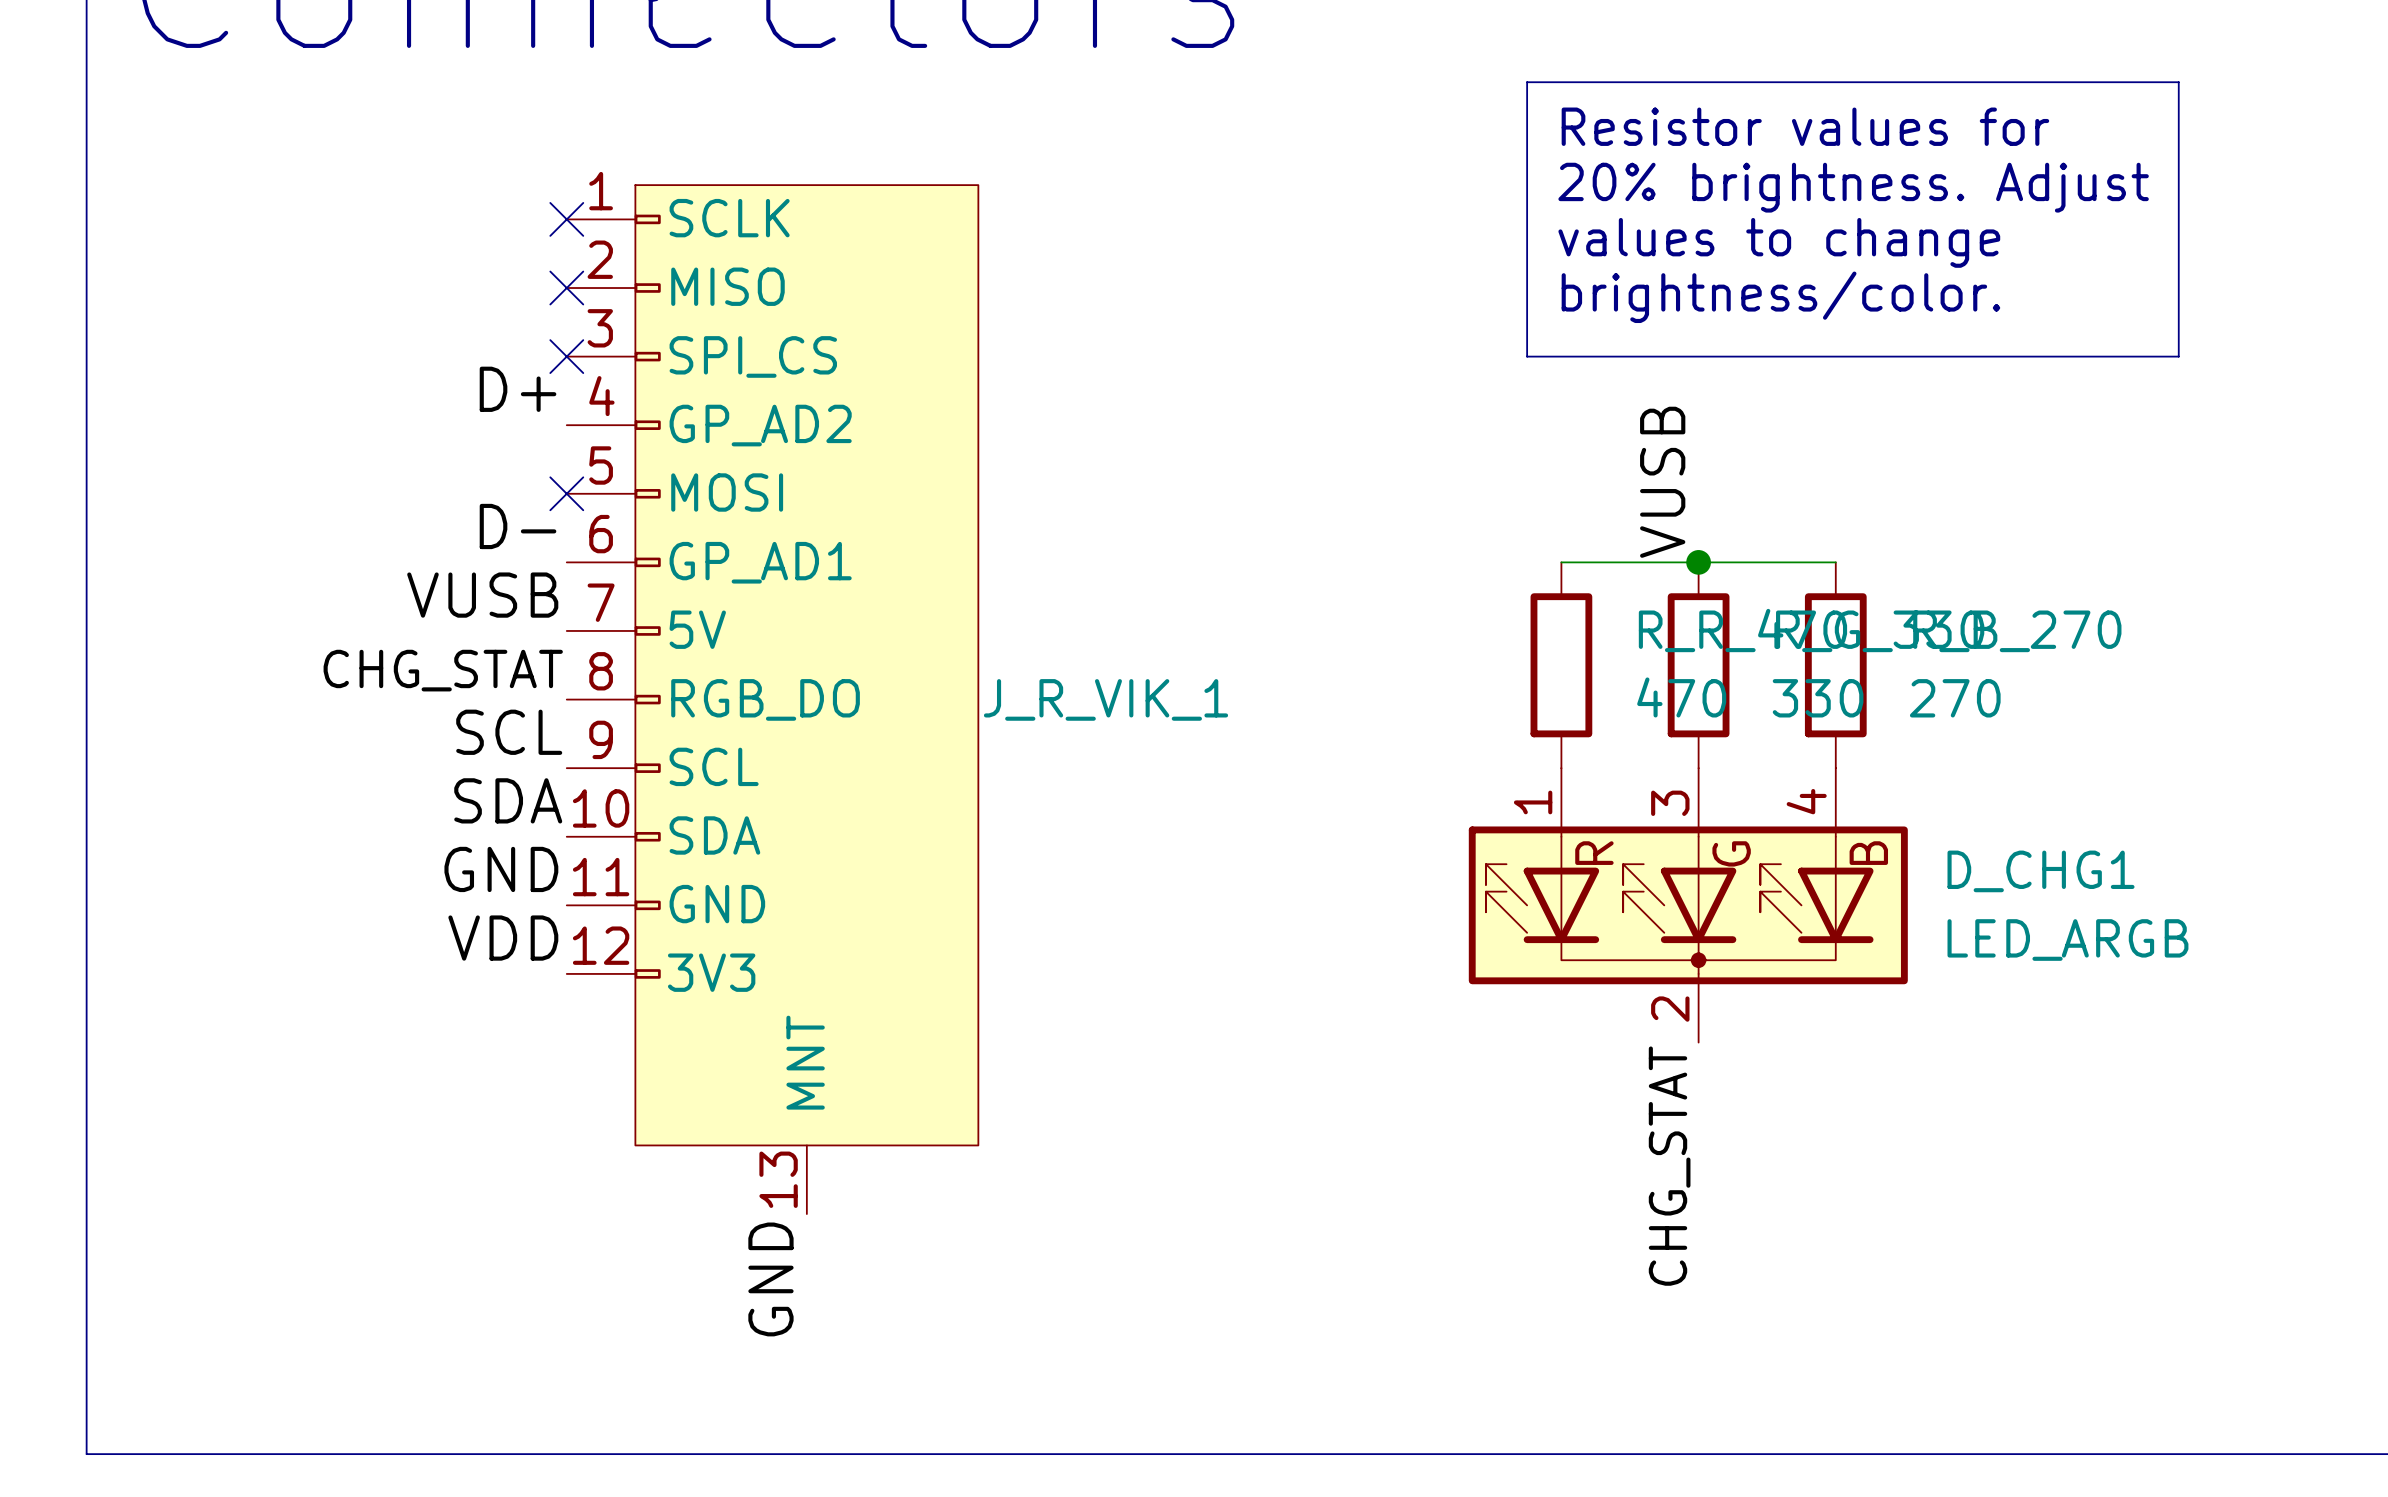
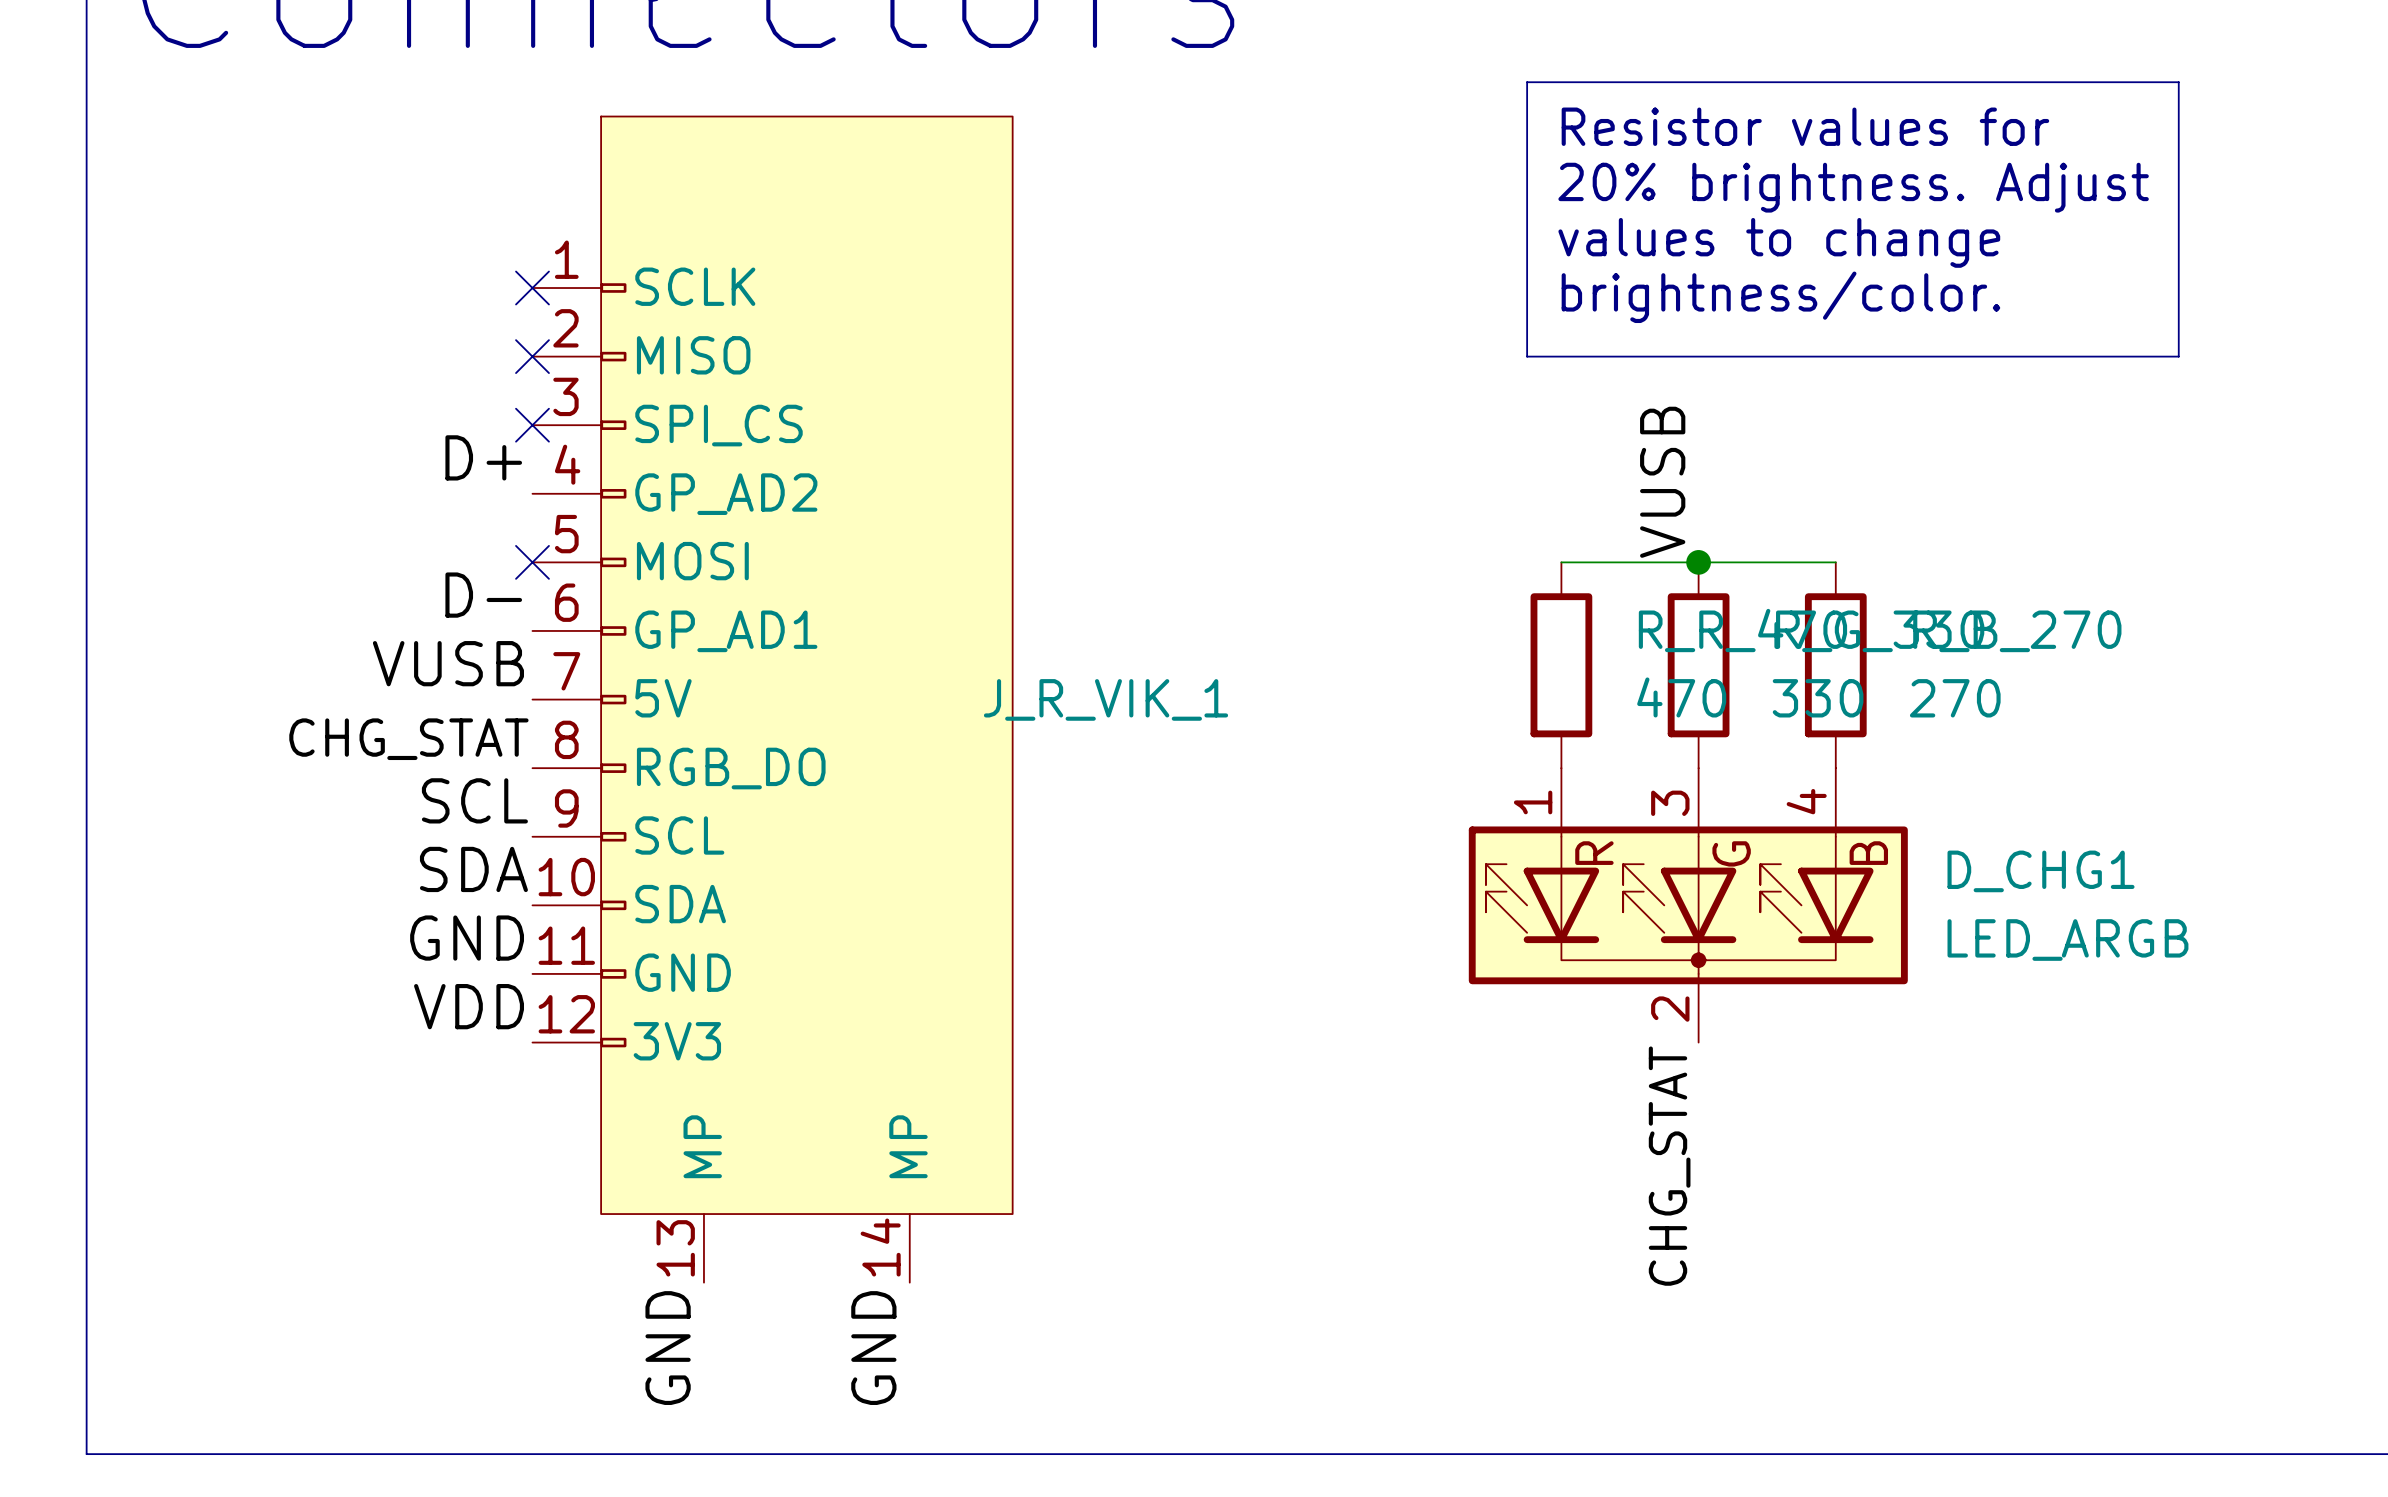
J_R_VIK_1 symbol: [566, 185, 979, 1215] -> [532, 116, 1013, 1283]
no-connect mark: (566, 219) -> none
no-connect mark position: (566, 288) -> (532, 288)
no-connect mark position: (566, 356) -> (532, 356)
label position: D+ (518, 389) -> D+ (483, 457)
no-connect mark: none -> (532, 425)
no-connect mark: (566, 493) -> none
label position: D- (518, 526) -> D- (483, 595)
no-connect mark: none -> (532, 562)
label position: VUSB (482, 595) -> VUSB (448, 663)
label position: CHG_STAT (443, 670) -> CHG_STAT (408, 739)
label position: SCL (509, 732) -> SCL (474, 800)
label position: SDA (508, 800) -> SDA (473, 869)
label position: GND (501, 869) -> GND (467, 938)
label position: VDD (503, 938) -> VDD (469, 1006)
label: GND (770, 1279) -> none
label: none -> GND (668, 1348)
label: none -> GND (873, 1348)

